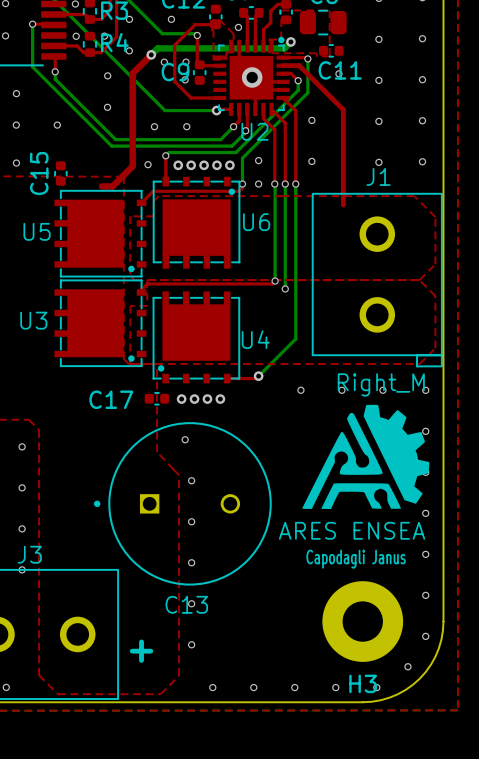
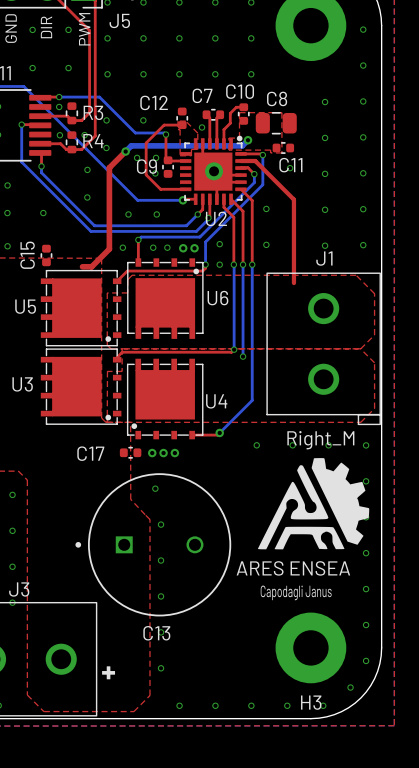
via: none -> (153, 247)
via: none -> (167, 247)
via: (178, 165) -> none
via: (191, 165) -> none
via: (204, 165) -> none
via: (220, 399) -> none

